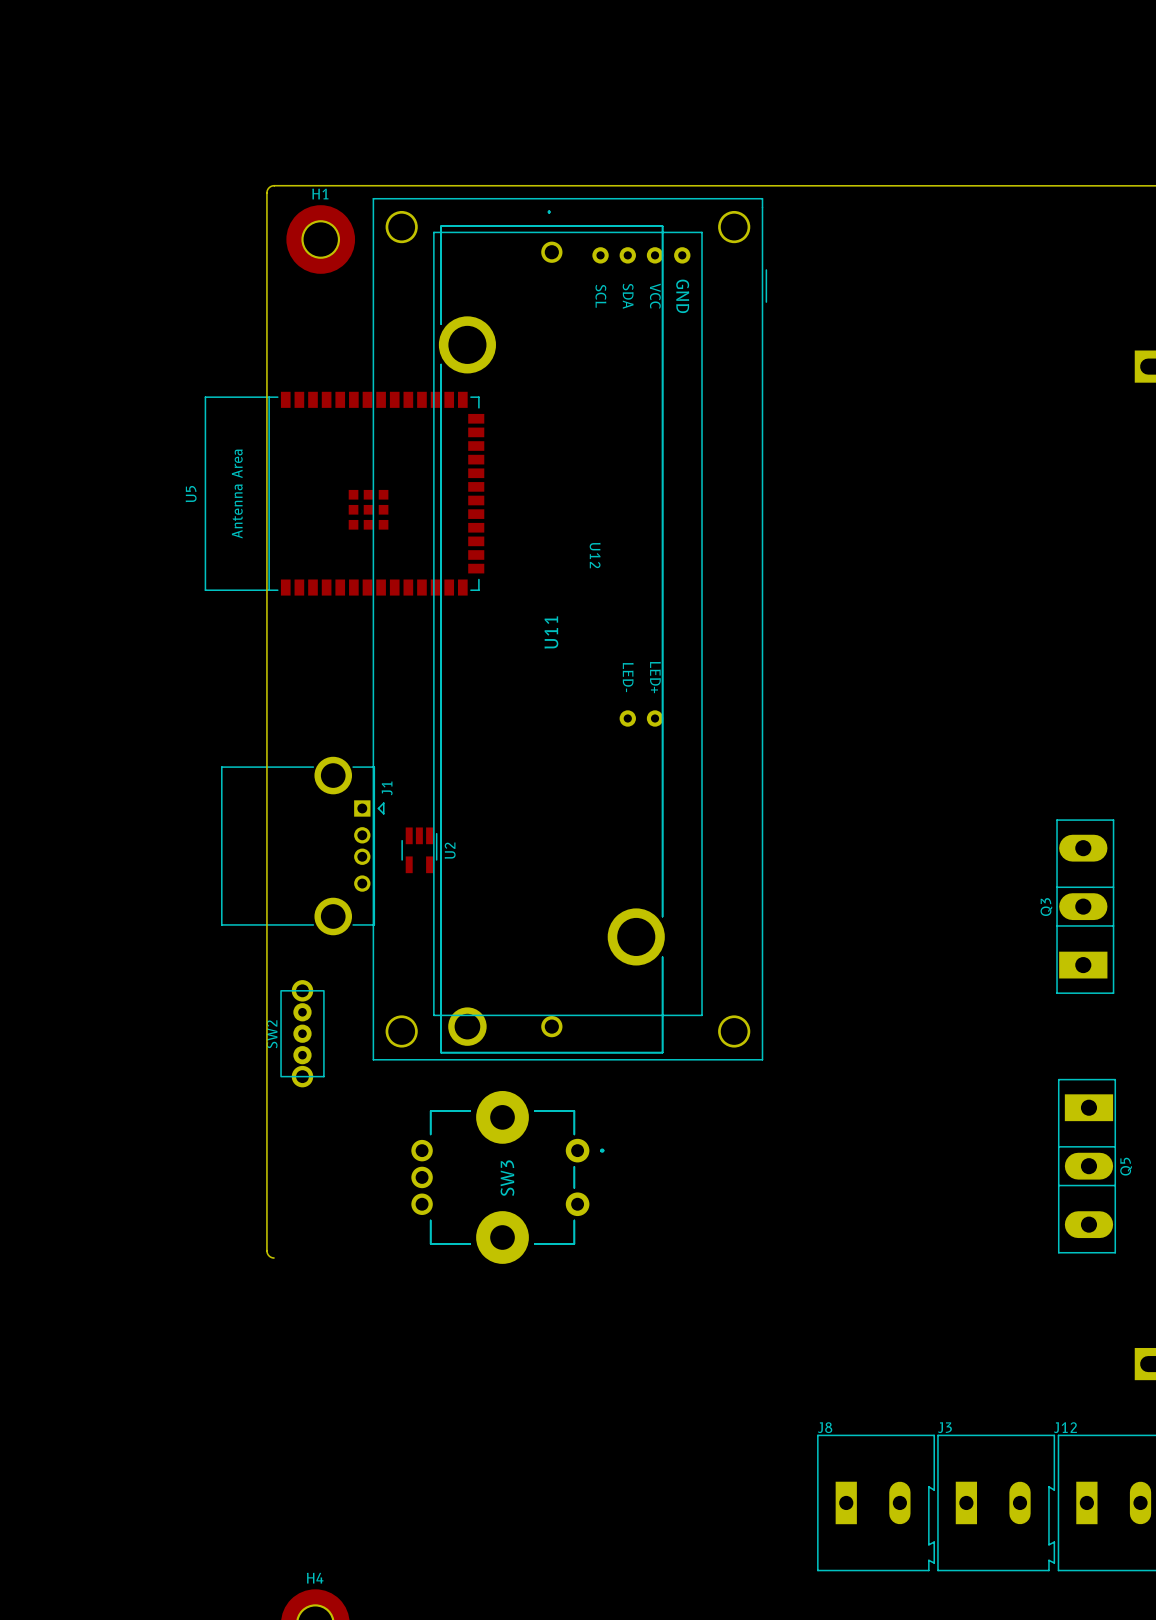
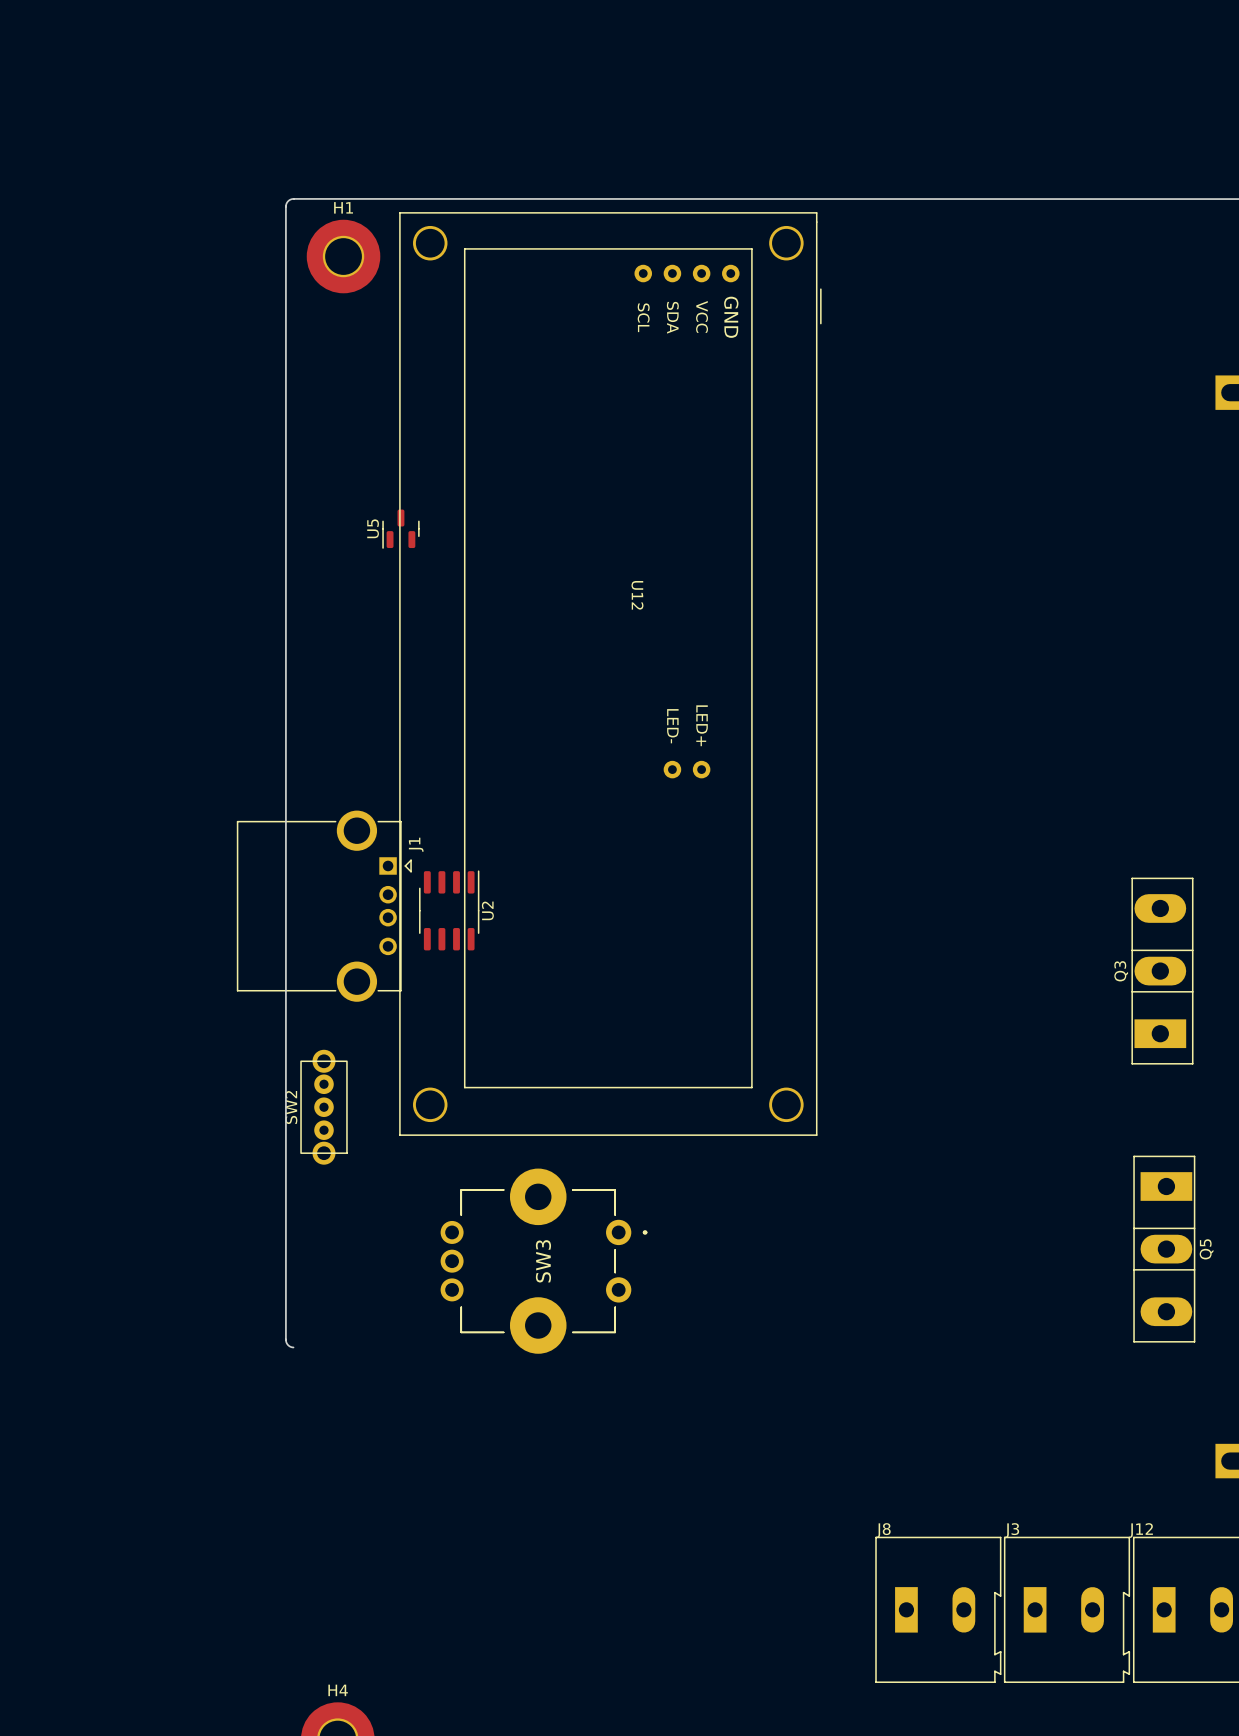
U5 footprint: [204, 391, 485, 596] -> [382, 509, 420, 549]
U5 name position: U5 (191, 494) -> U5 (373, 528)
U11: (551, 631) -> none
U2 footprint: [401, 827, 438, 874] -> [419, 870, 480, 951]

